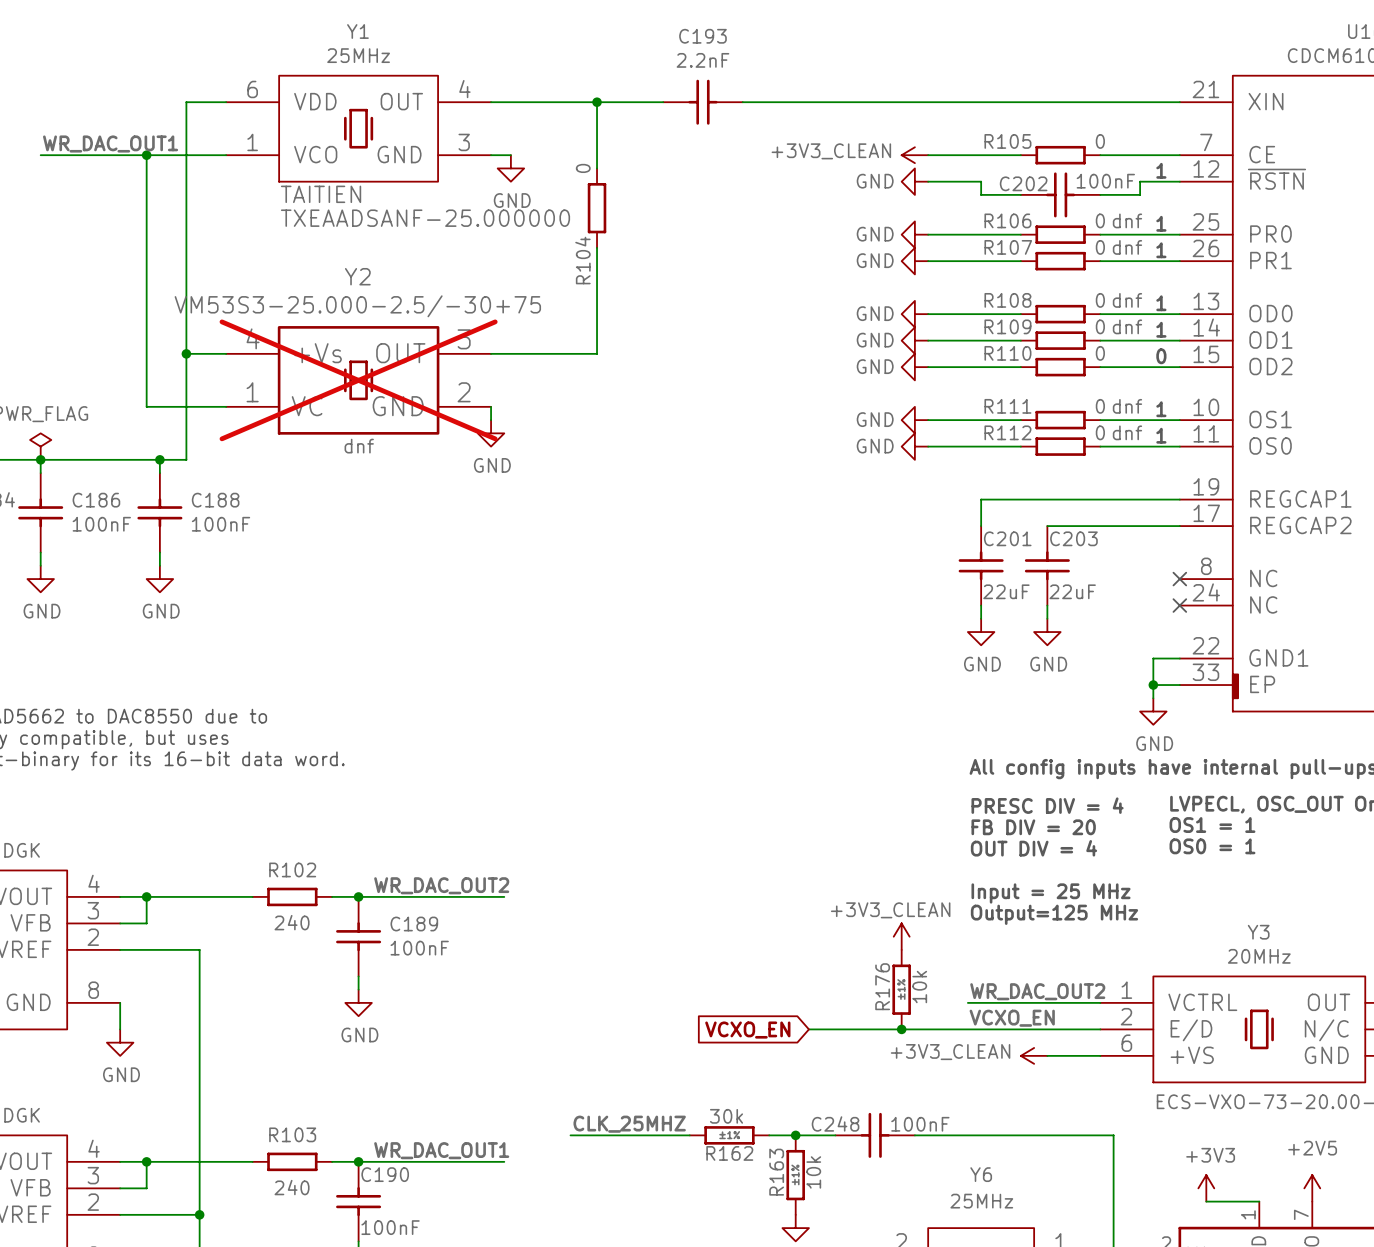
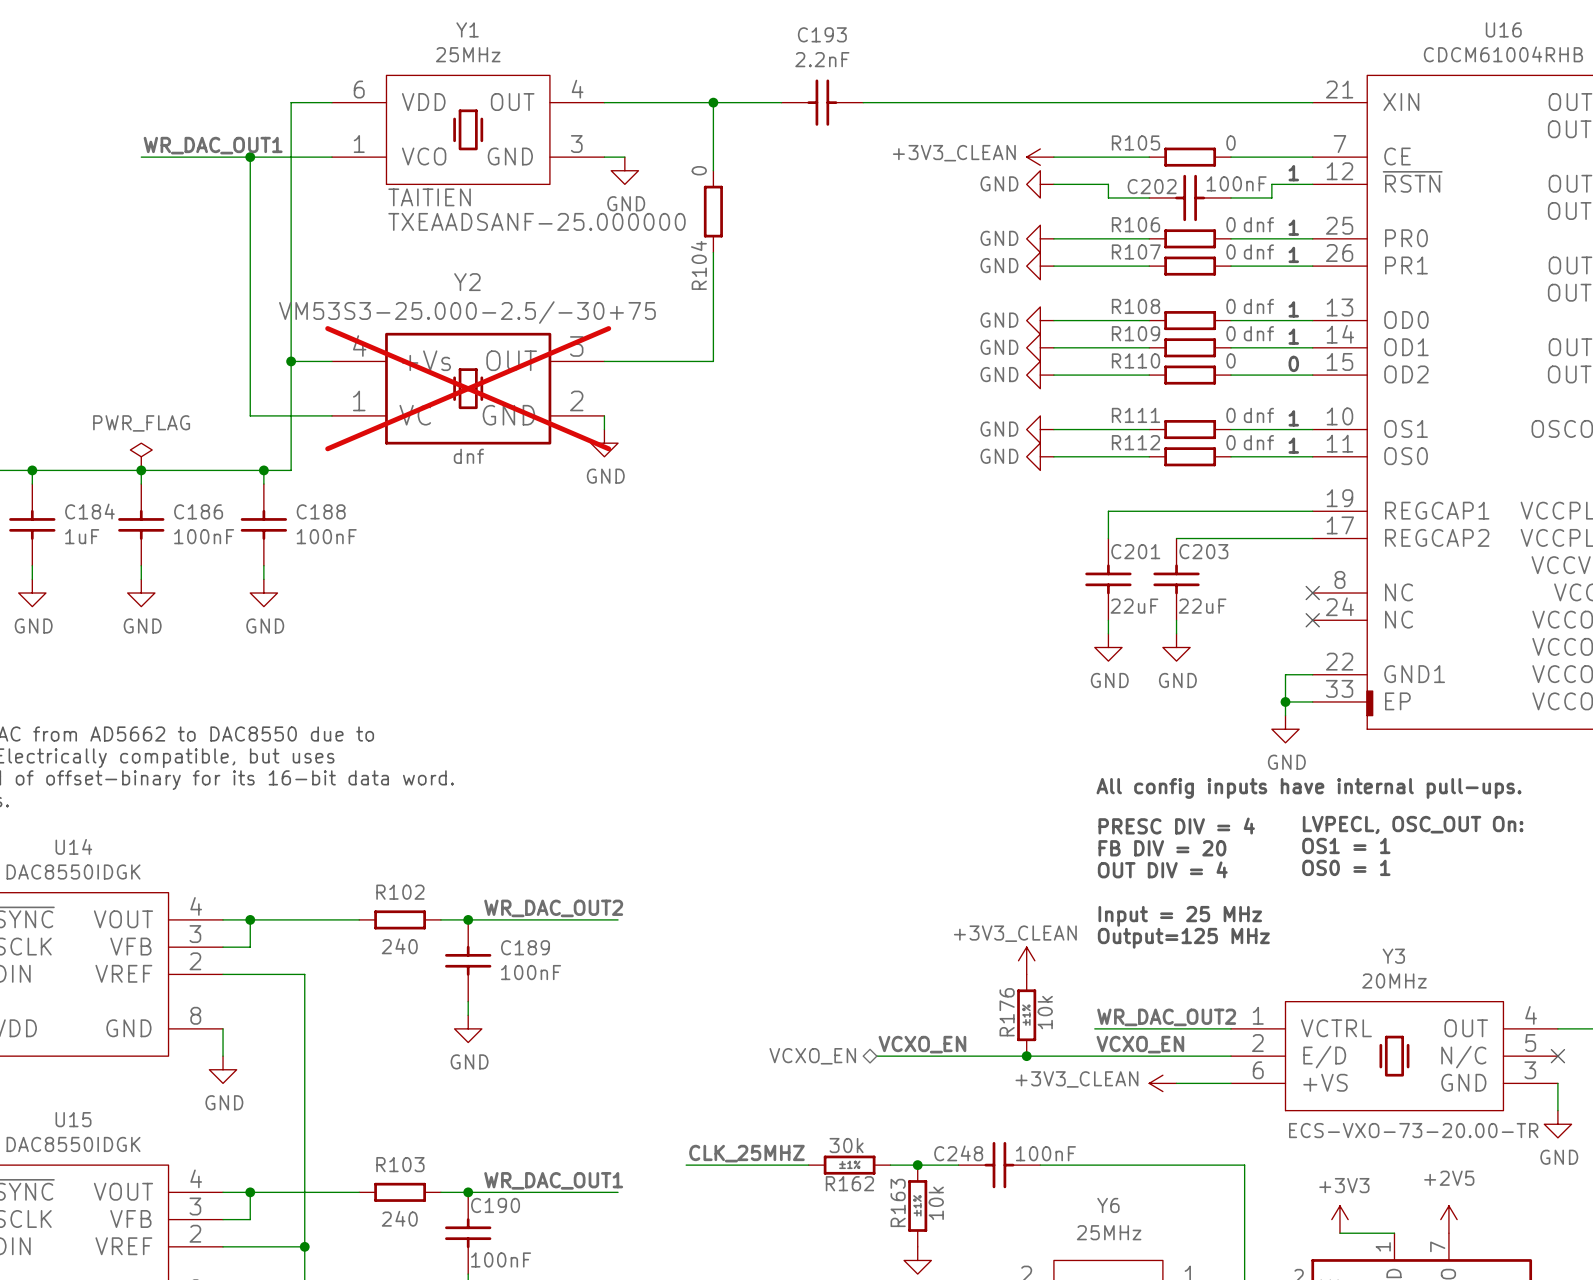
label: none -> VCXO_EN (922, 1044)
hierarchical label: none -> VCXO_EN (812, 1056)
wire: none -> (876, 1056) (931, 1056)
global label: VCXO_EN (747, 1030) -> none

